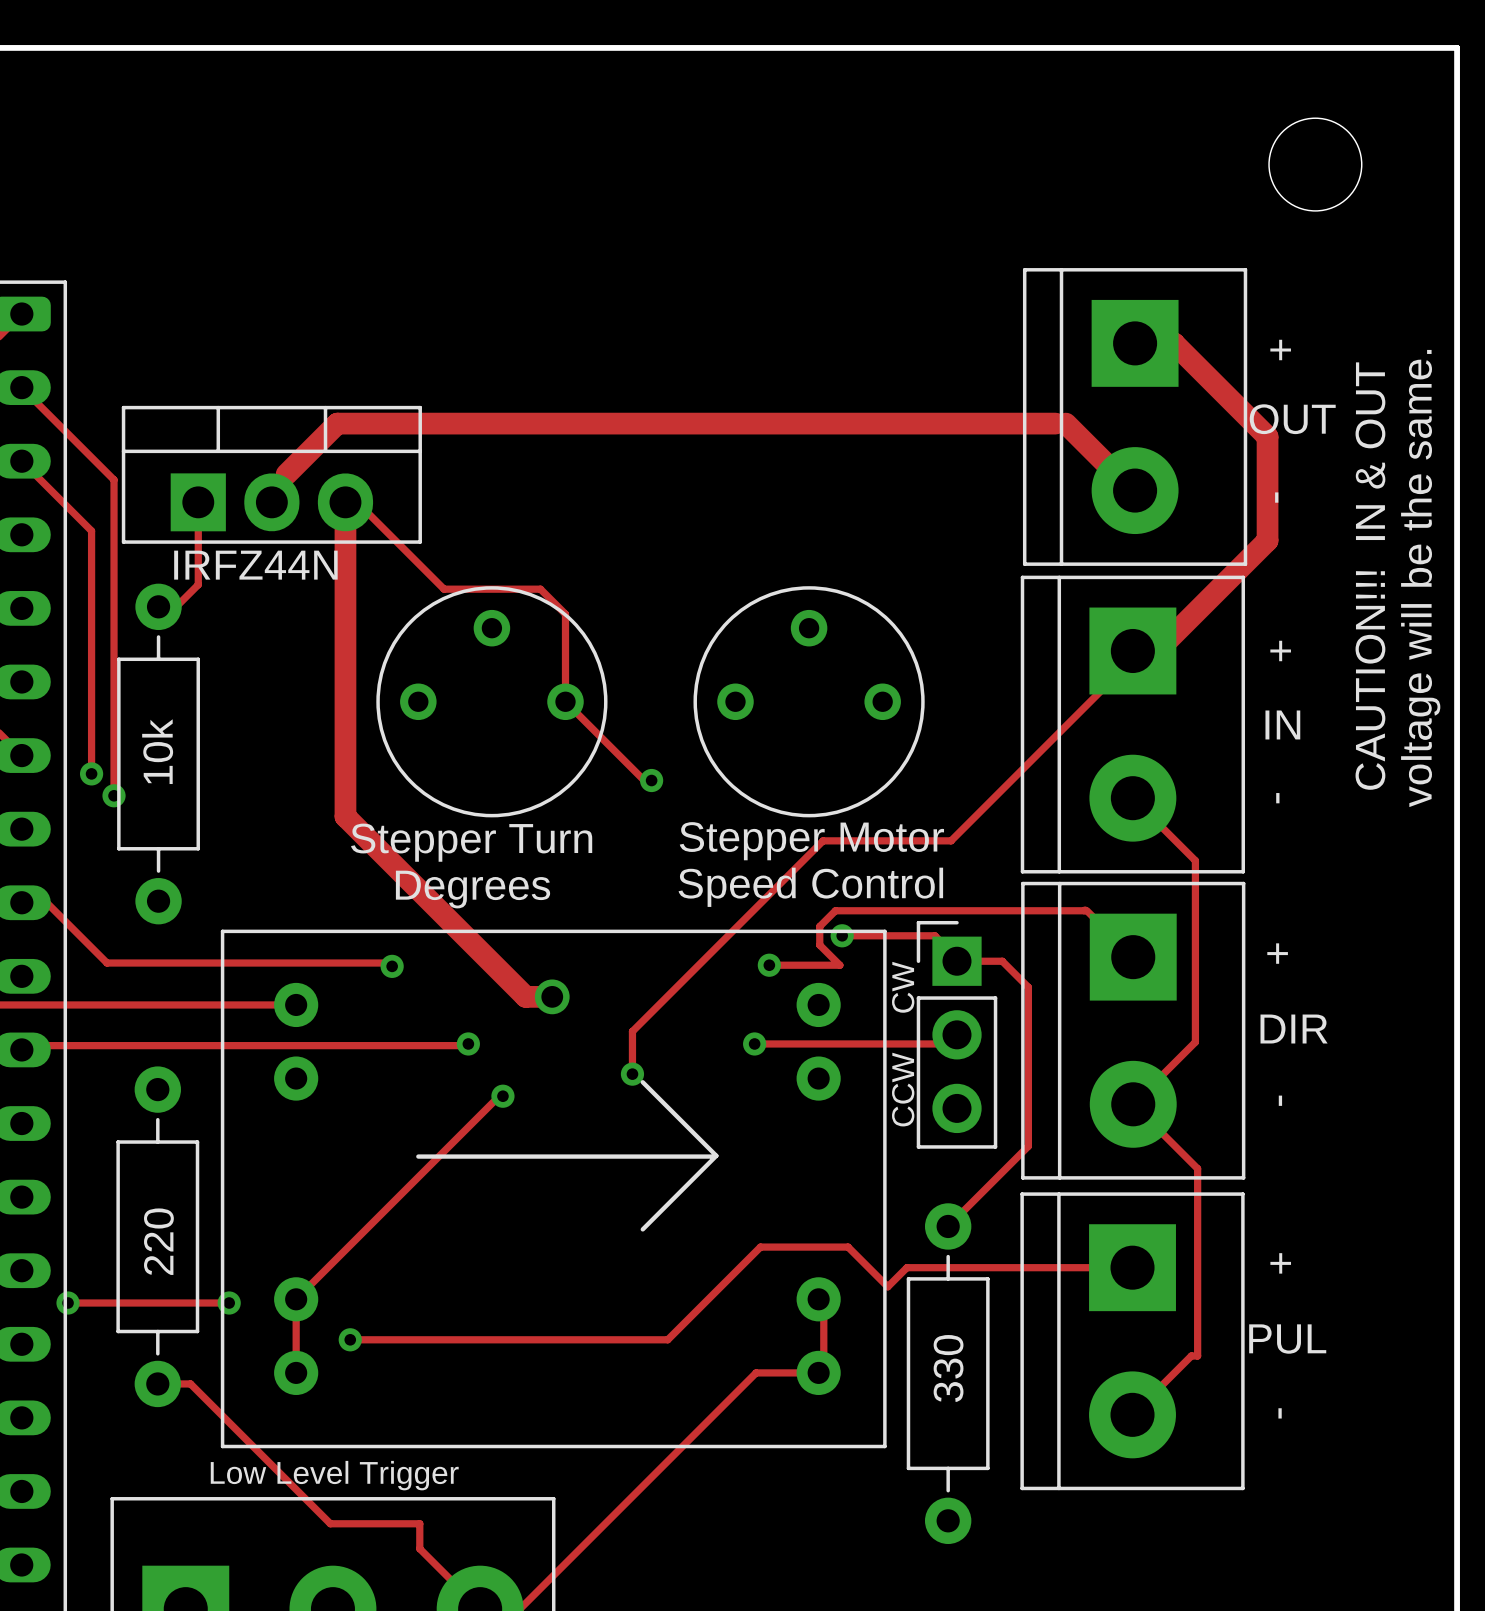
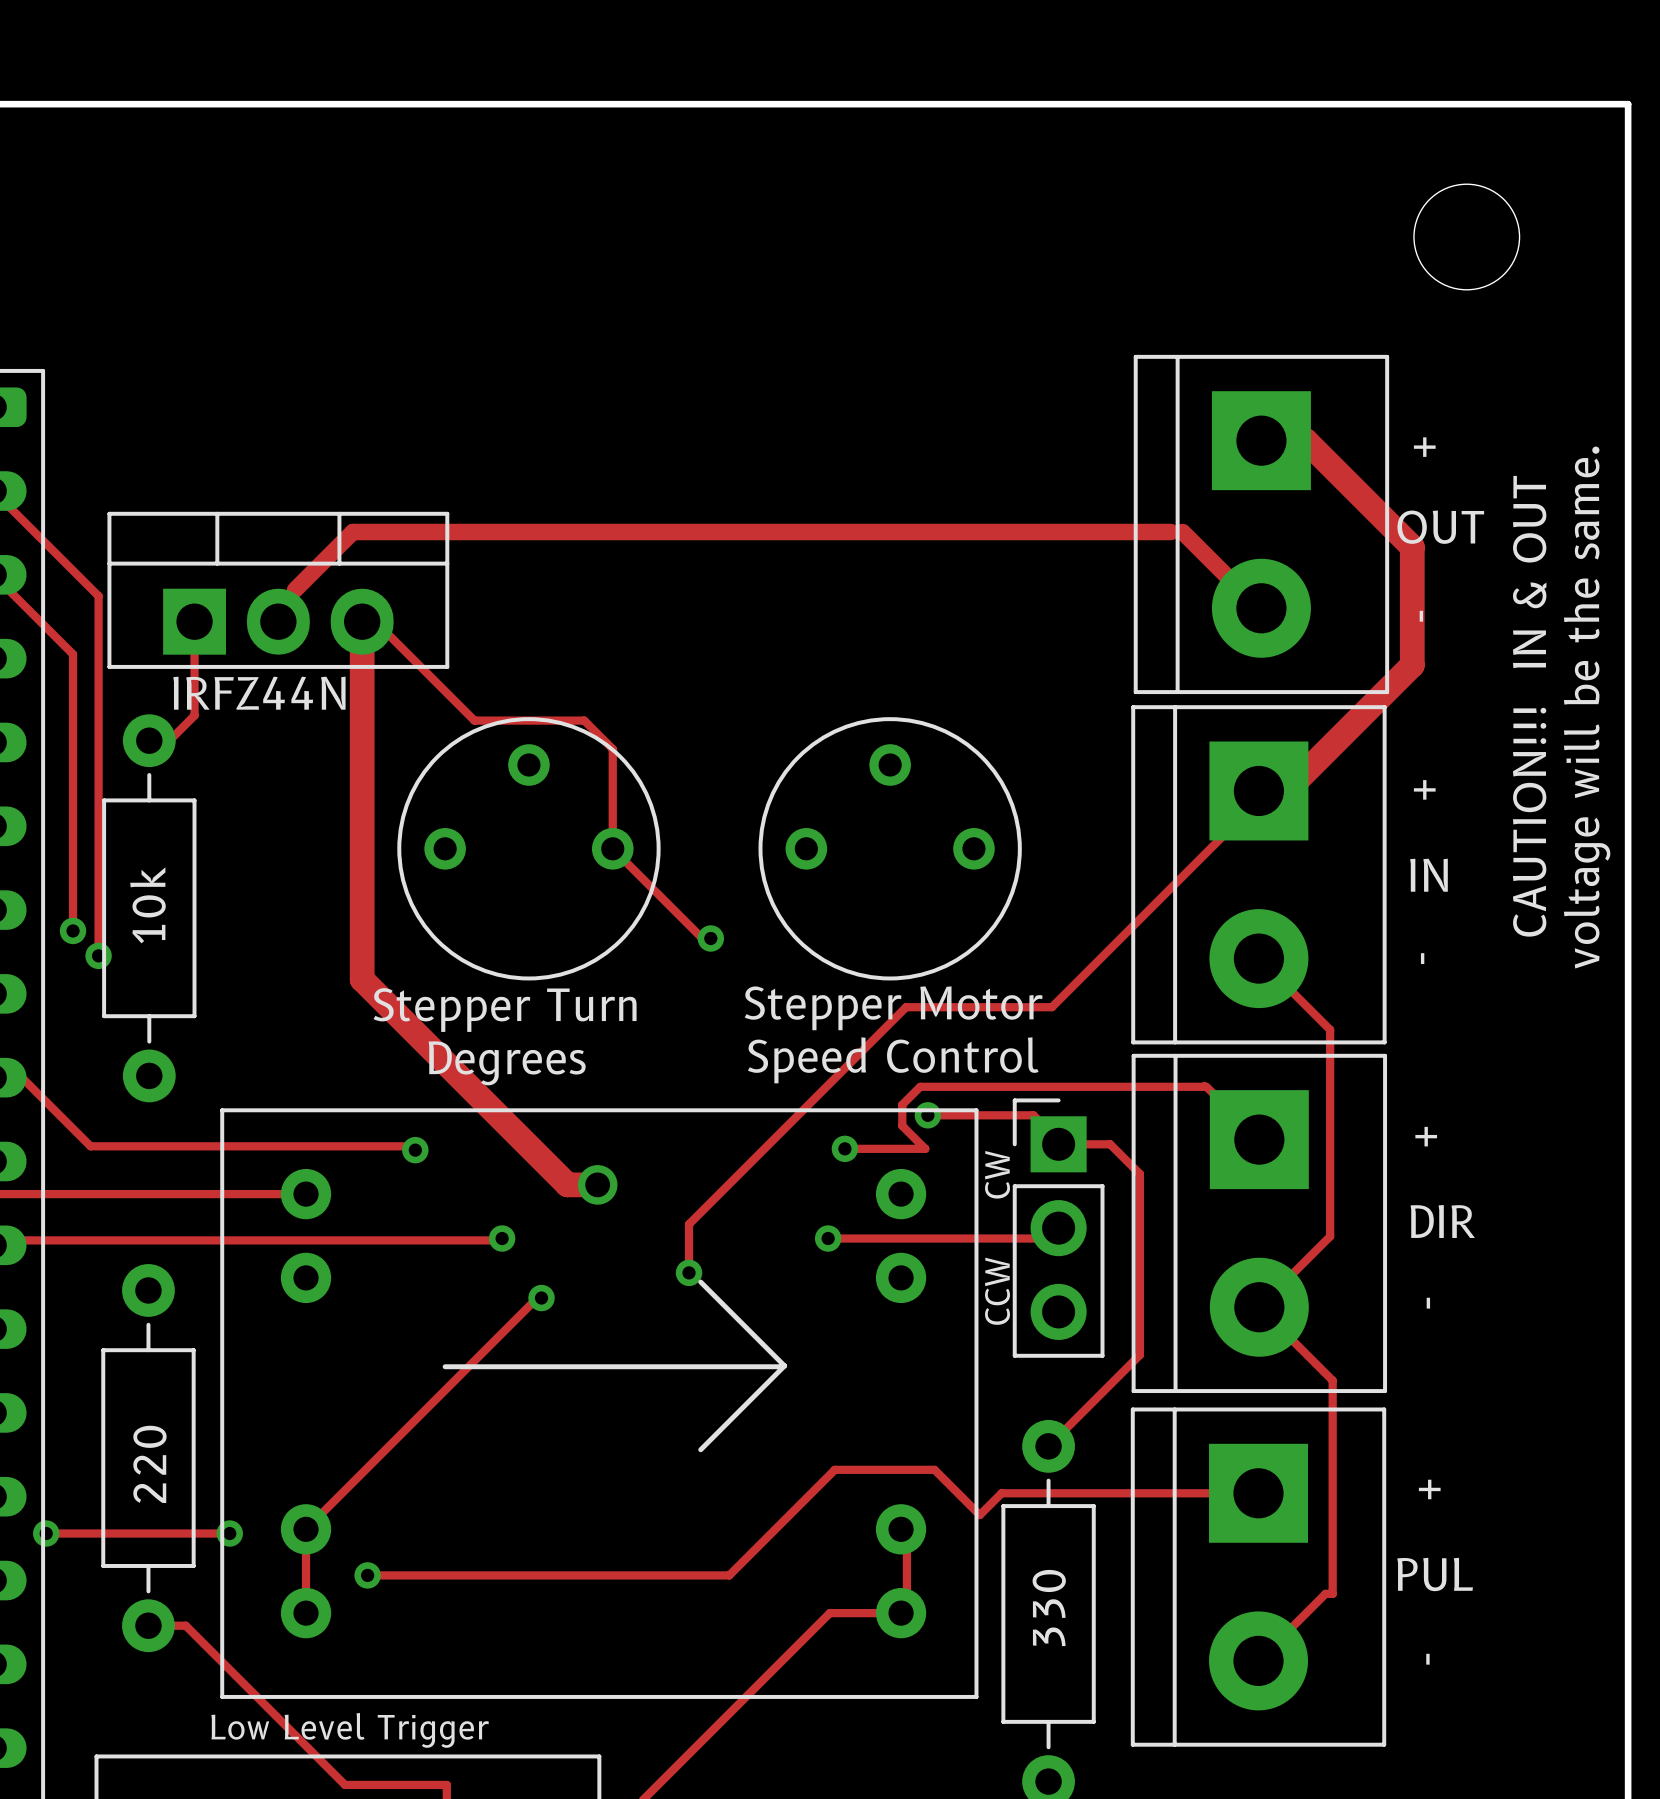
track width: thick (1055, 423) (337, 423) (286, 474) -> thin (1170, 532) (352, 532) (295, 589)
track width: thick (1065, 423) (1132, 490) -> thin (1182, 532) (1258, 608)

